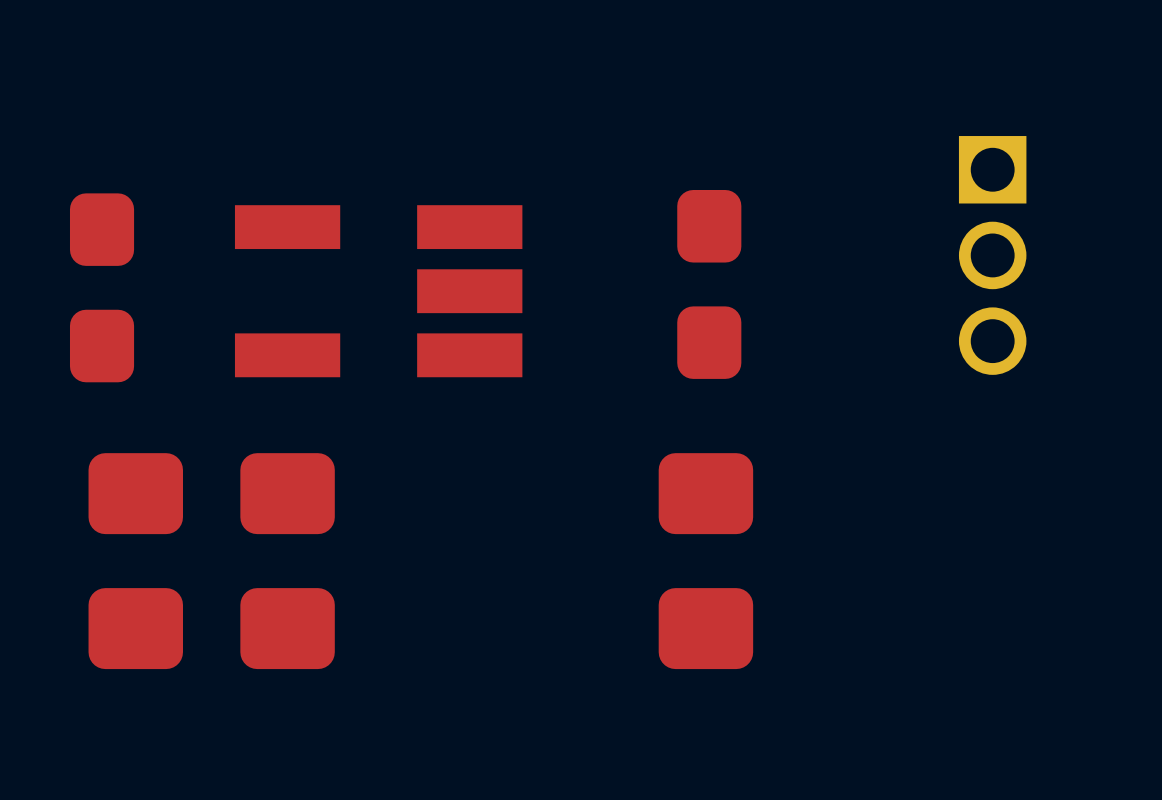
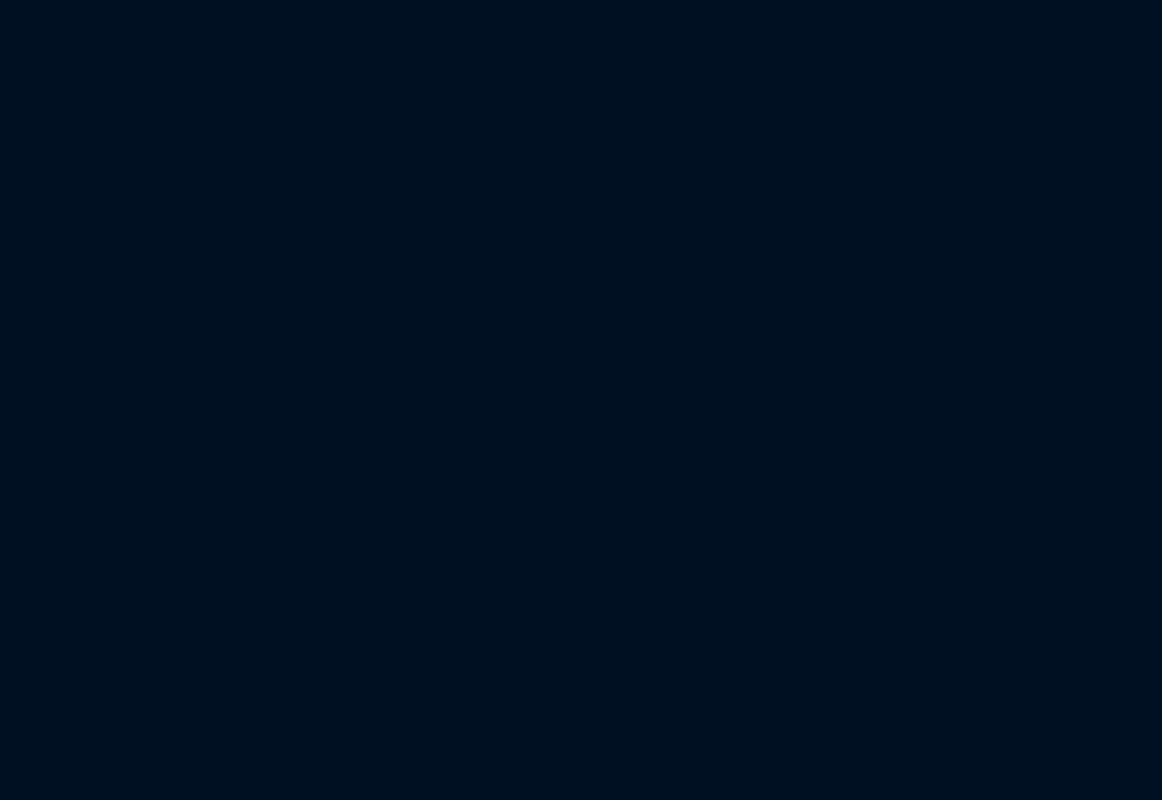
part: (992, 255) -> none
part: (709, 284) -> none
part: (102, 287) -> none
part: (378, 291) -> none
part: (135, 561) -> none
part: (287, 561) -> none
part: (705, 561) -> none

